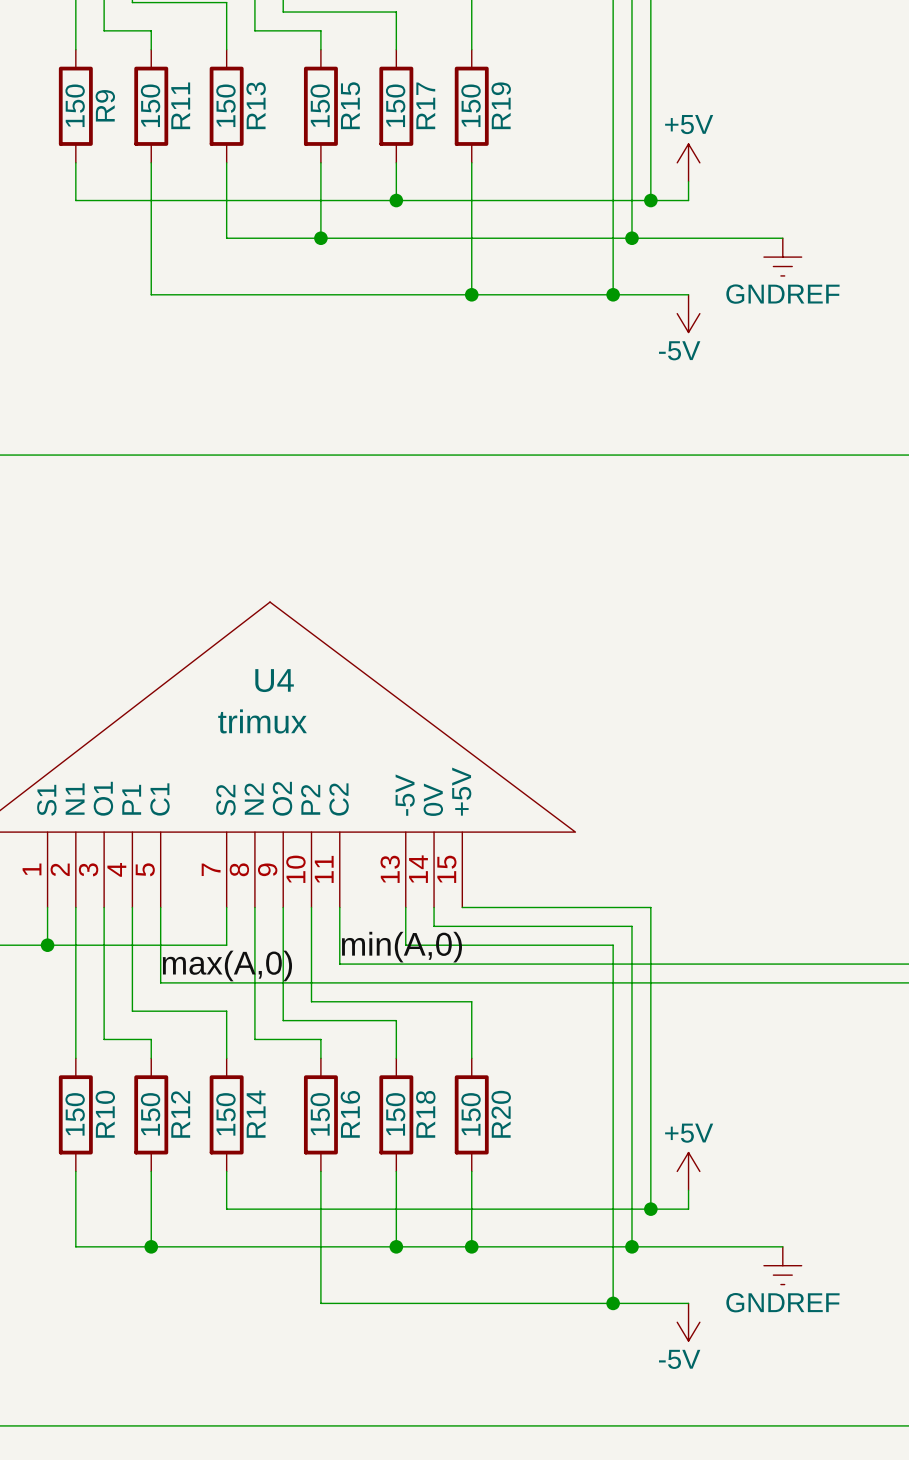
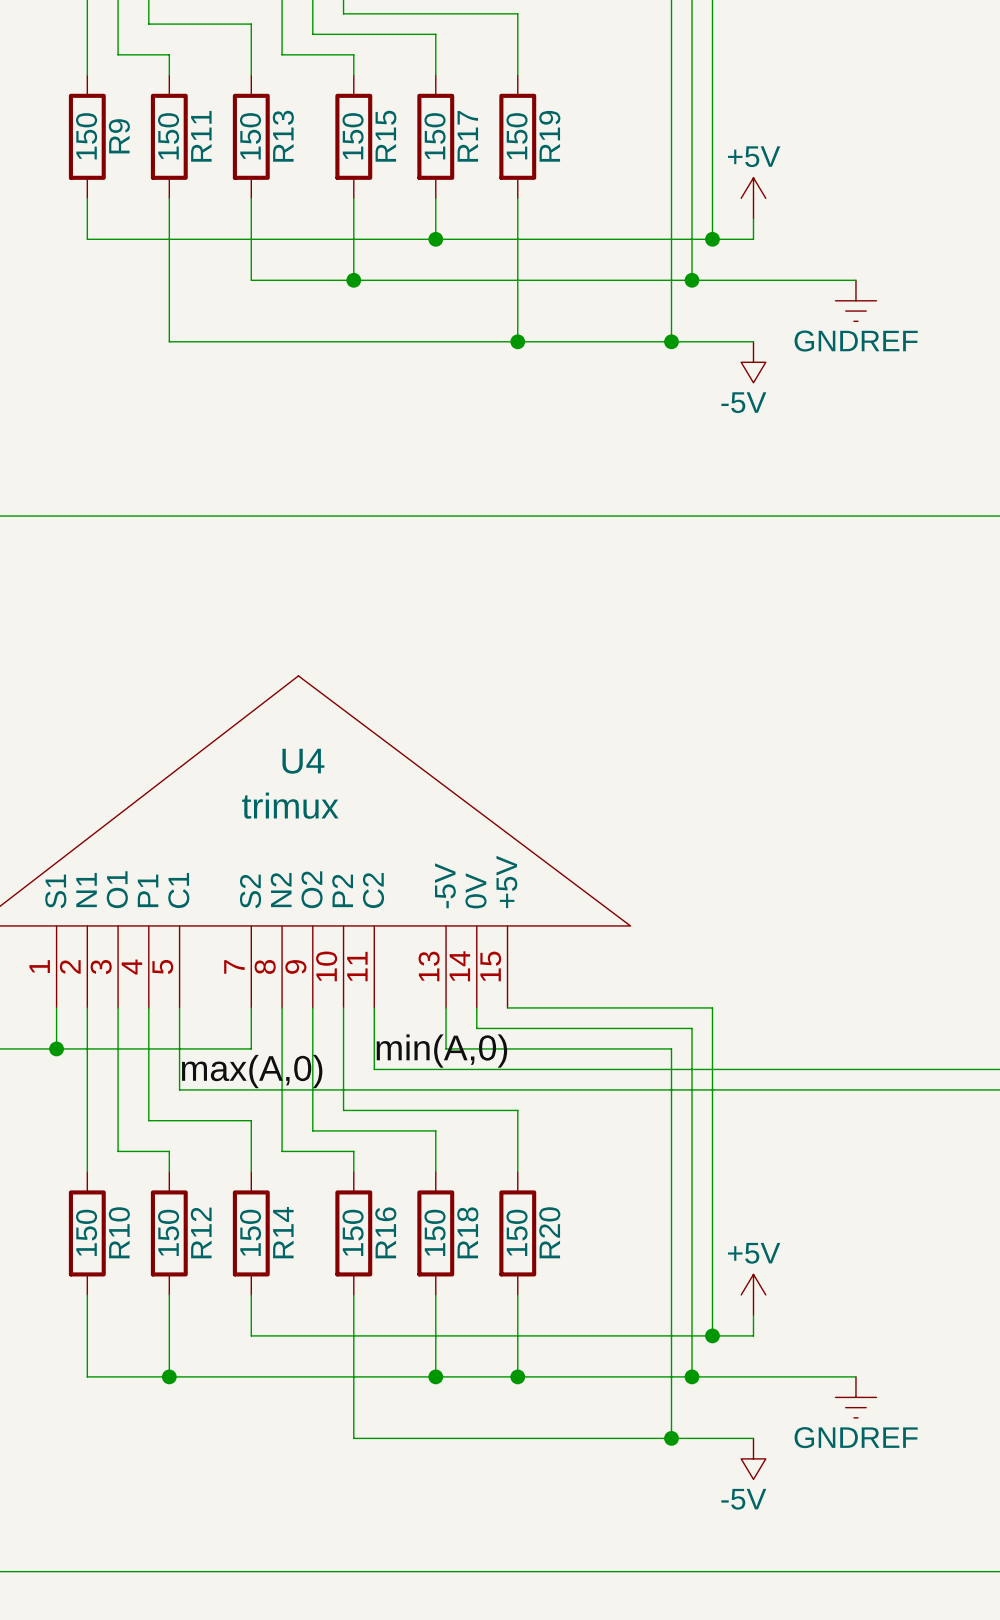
power symbol shape: [677, 294, 700, 333] -> [741, 341, 766, 383]
power symbol shape: [677, 1303, 700, 1342] -> [741, 1438, 766, 1480]

